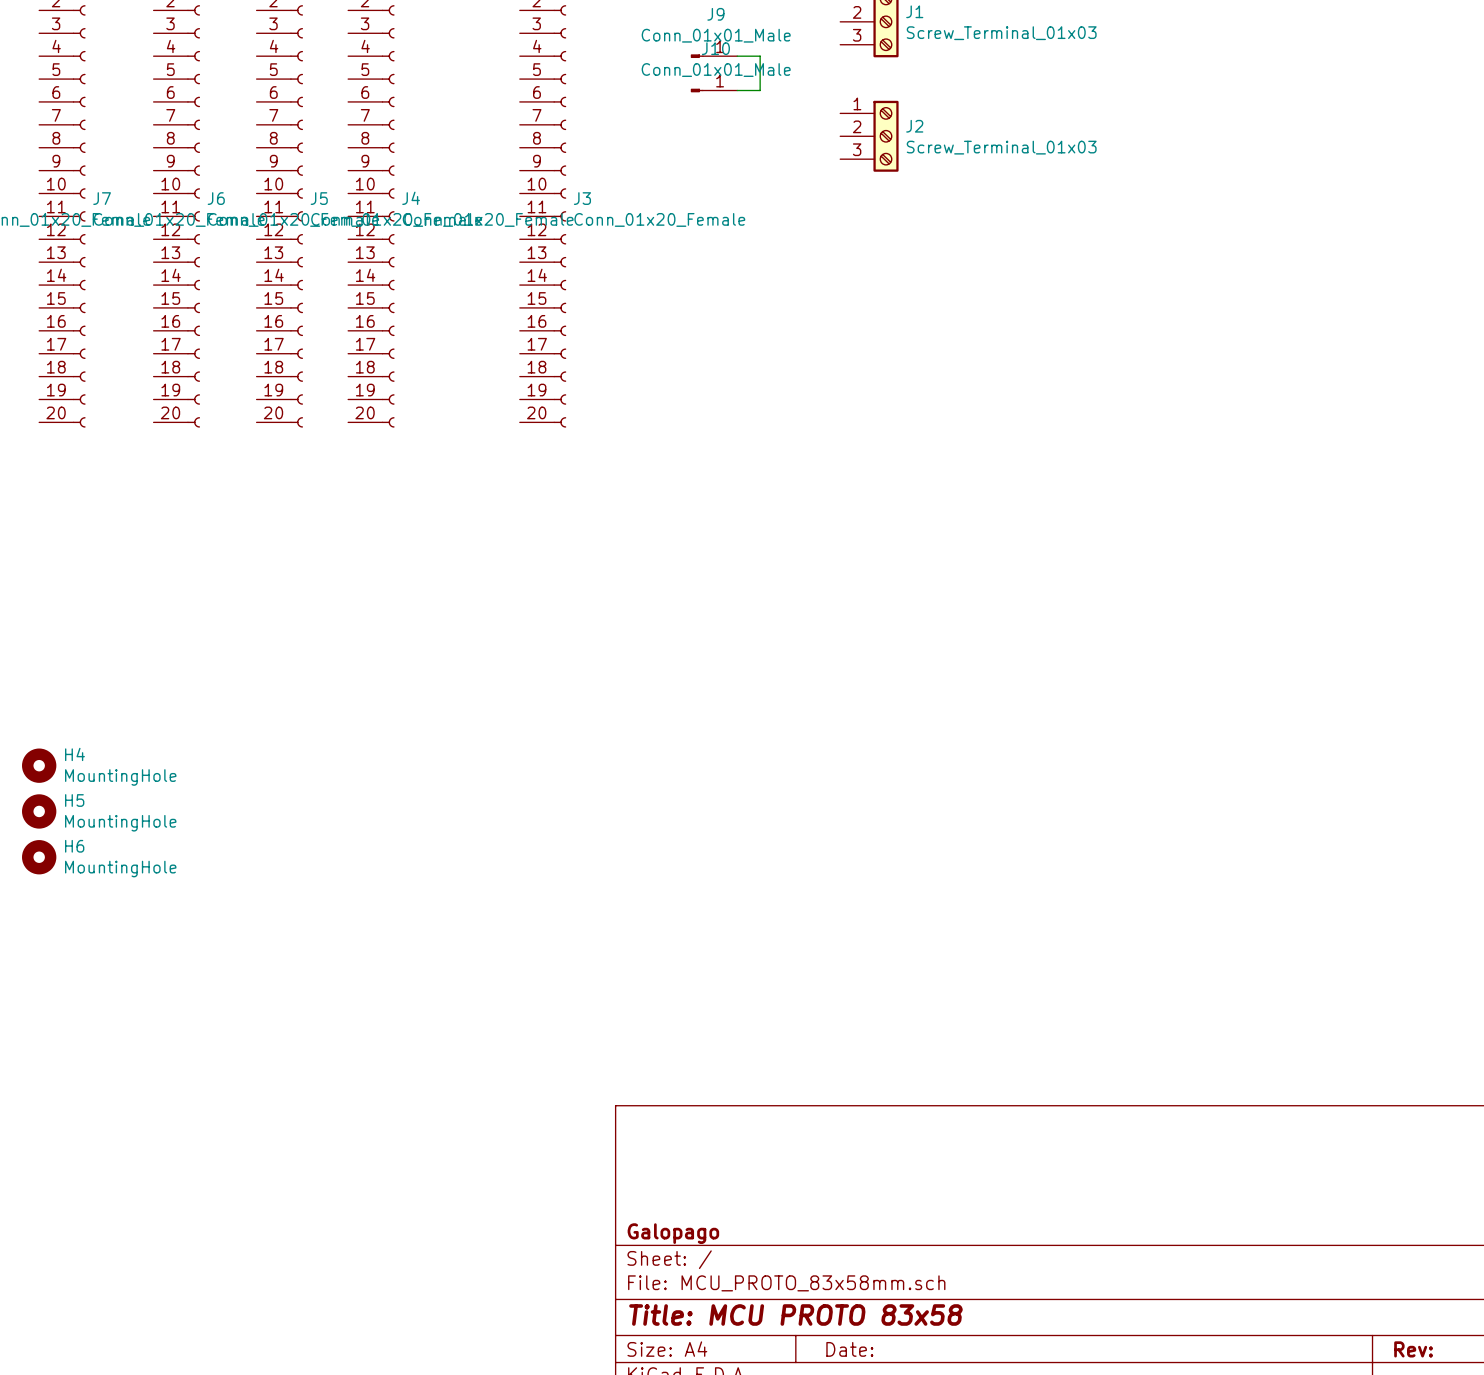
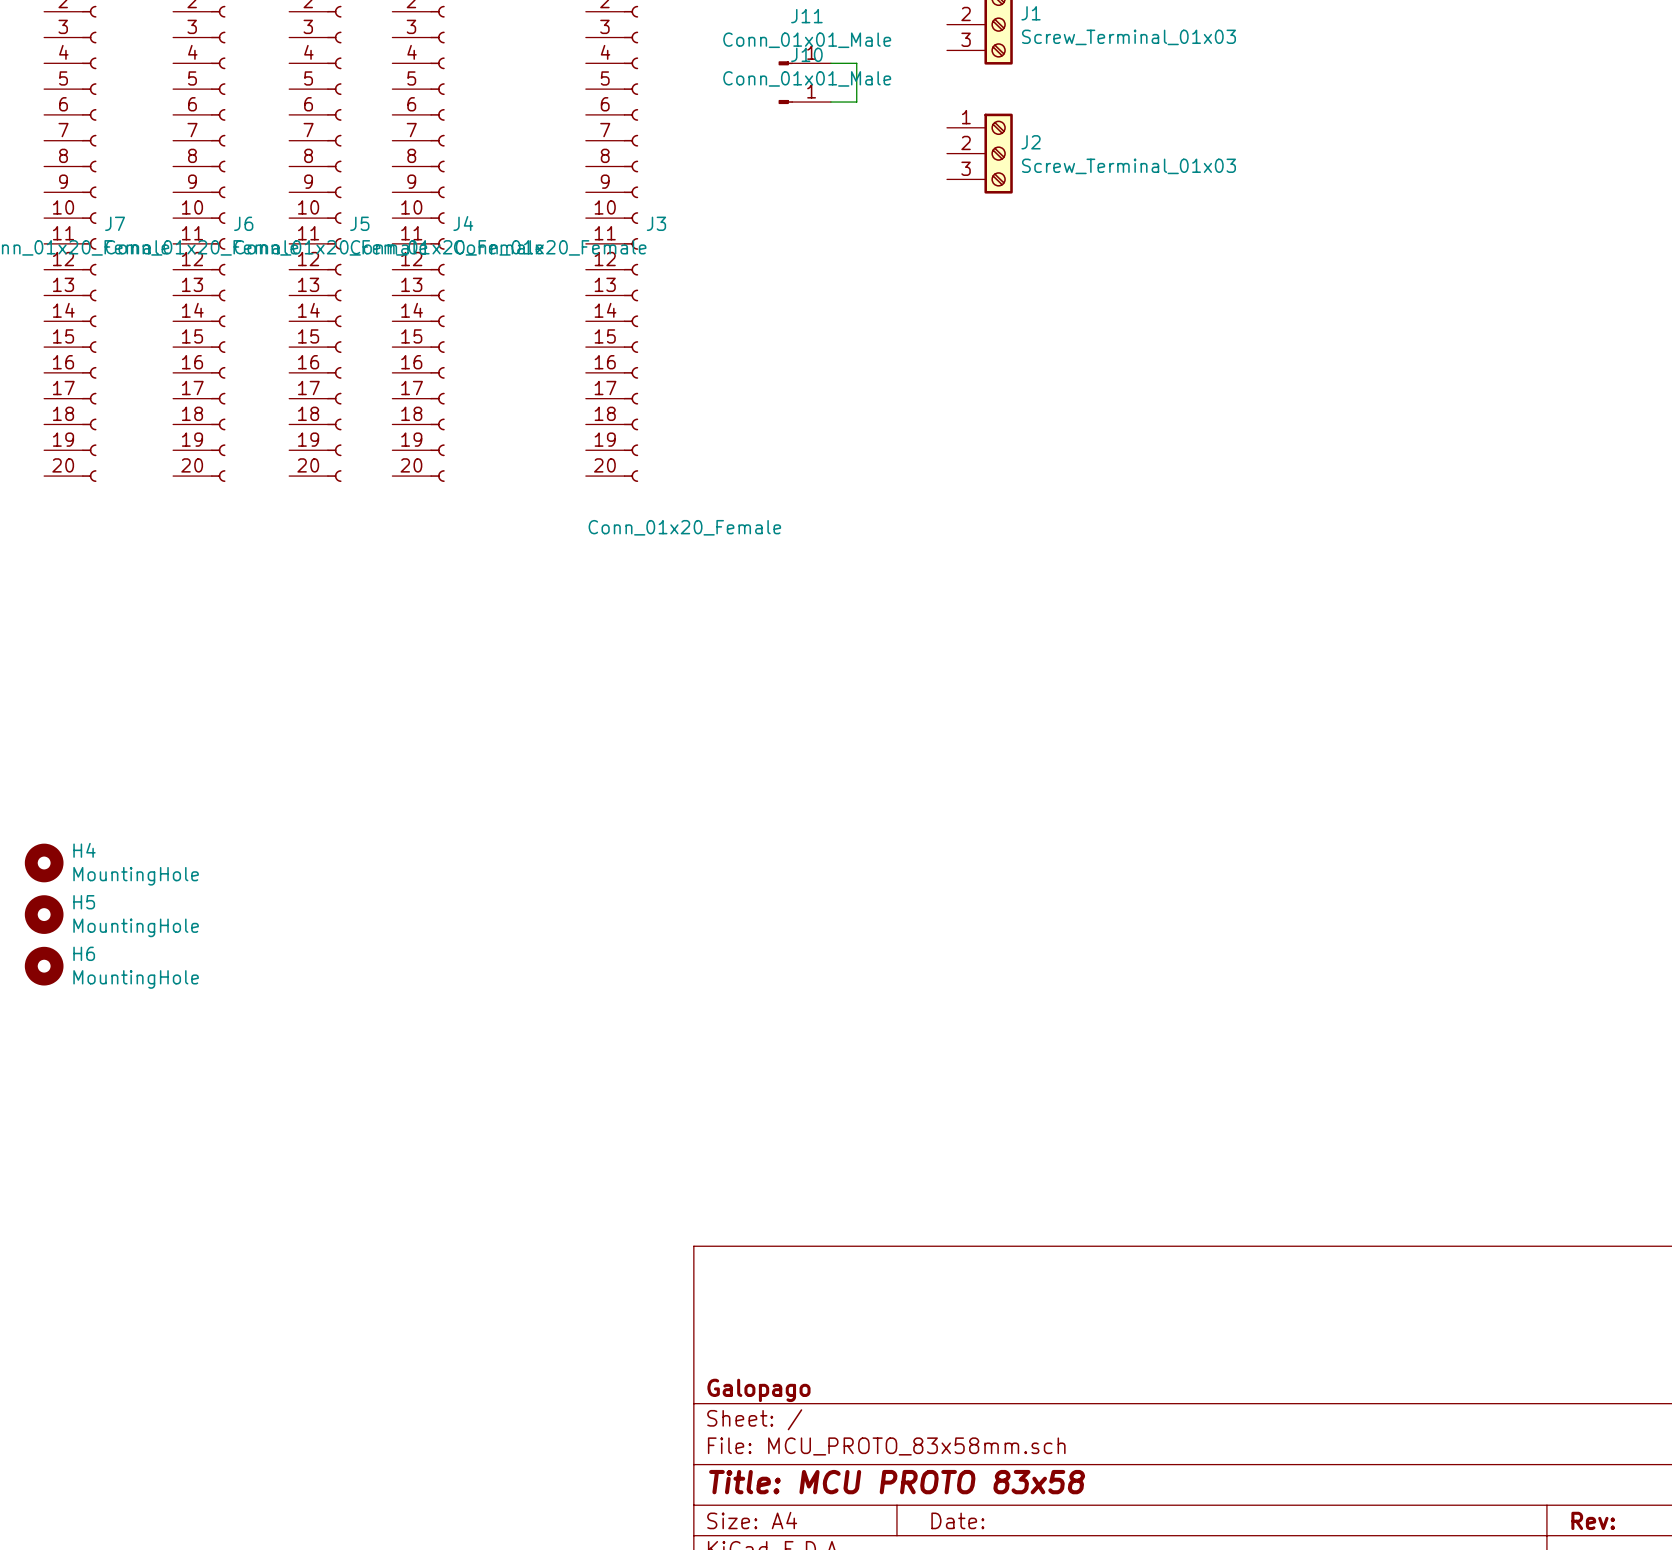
J9 name: J9 (715, 14) -> J11 (806, 16)
J3 value position: Conn_01x20_Female (659, 219) -> Conn_01x20_Female (684, 527)

